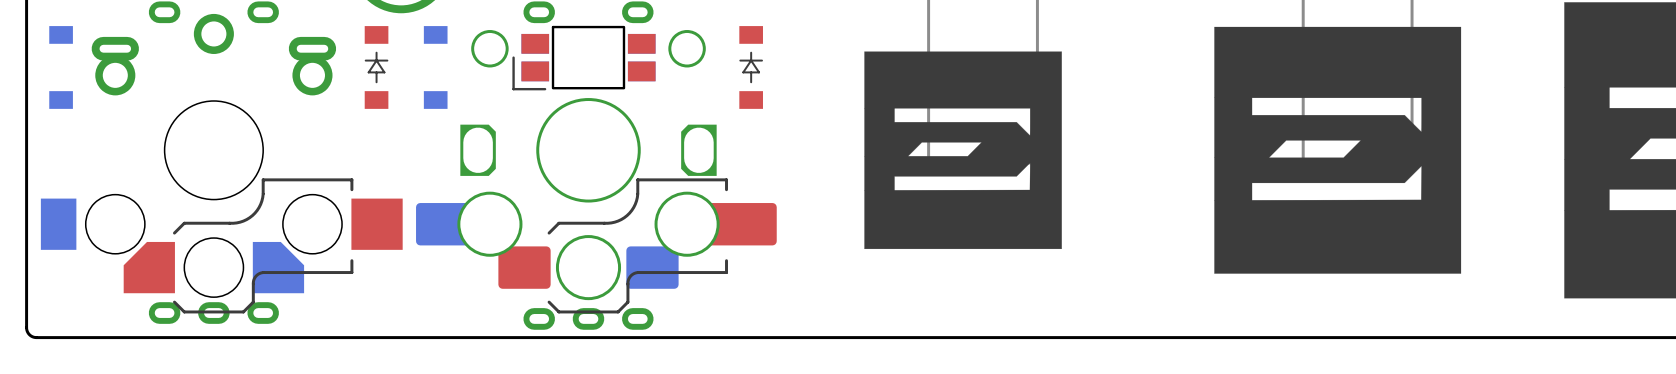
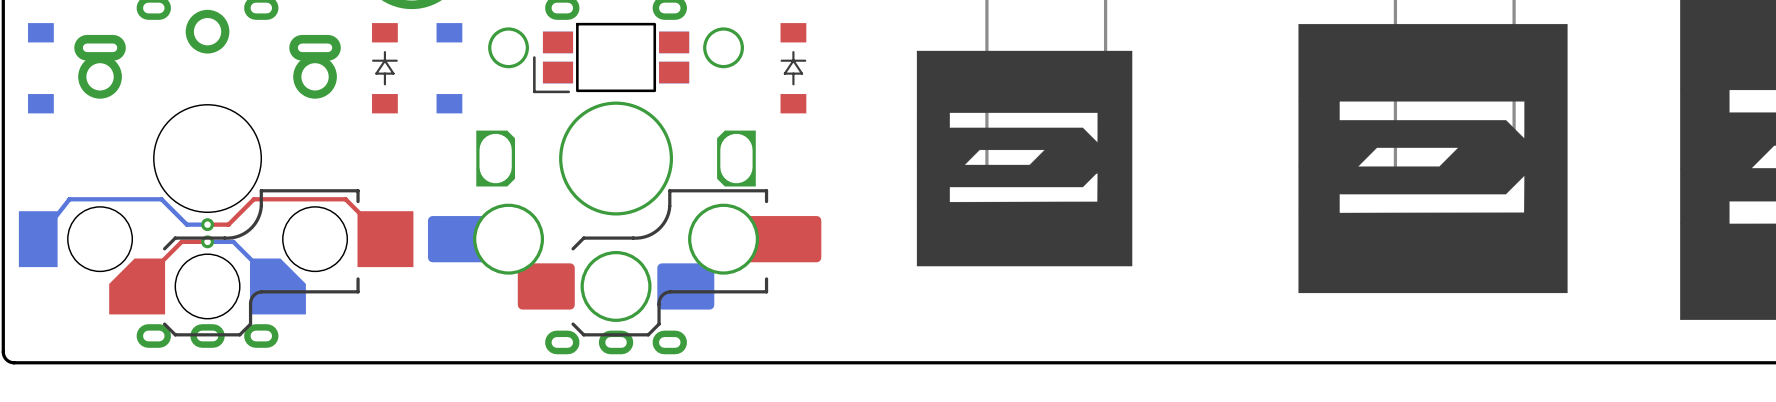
top track: none -> (207, 224) (228, 224) (253, 199) (345, 199) (385, 239)
bottom track: none -> (207, 224) (186, 224) (161, 199) (69, 199) (38, 239)
via: none -> (207, 224)
top track: none -> (207, 241) (181, 241) (137, 286)
bottom track: none -> (207, 241) (233, 241) (277, 286)
via: none -> (207, 241)

